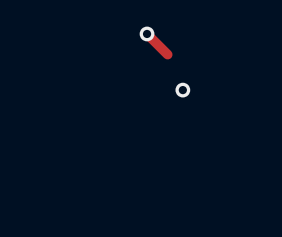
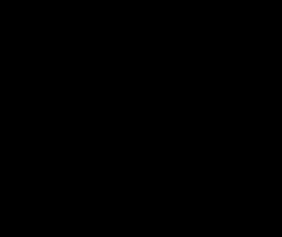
track: (147, 33) (167, 54) -> none
via: (147, 33) -> none
via: (182, 90) -> none

